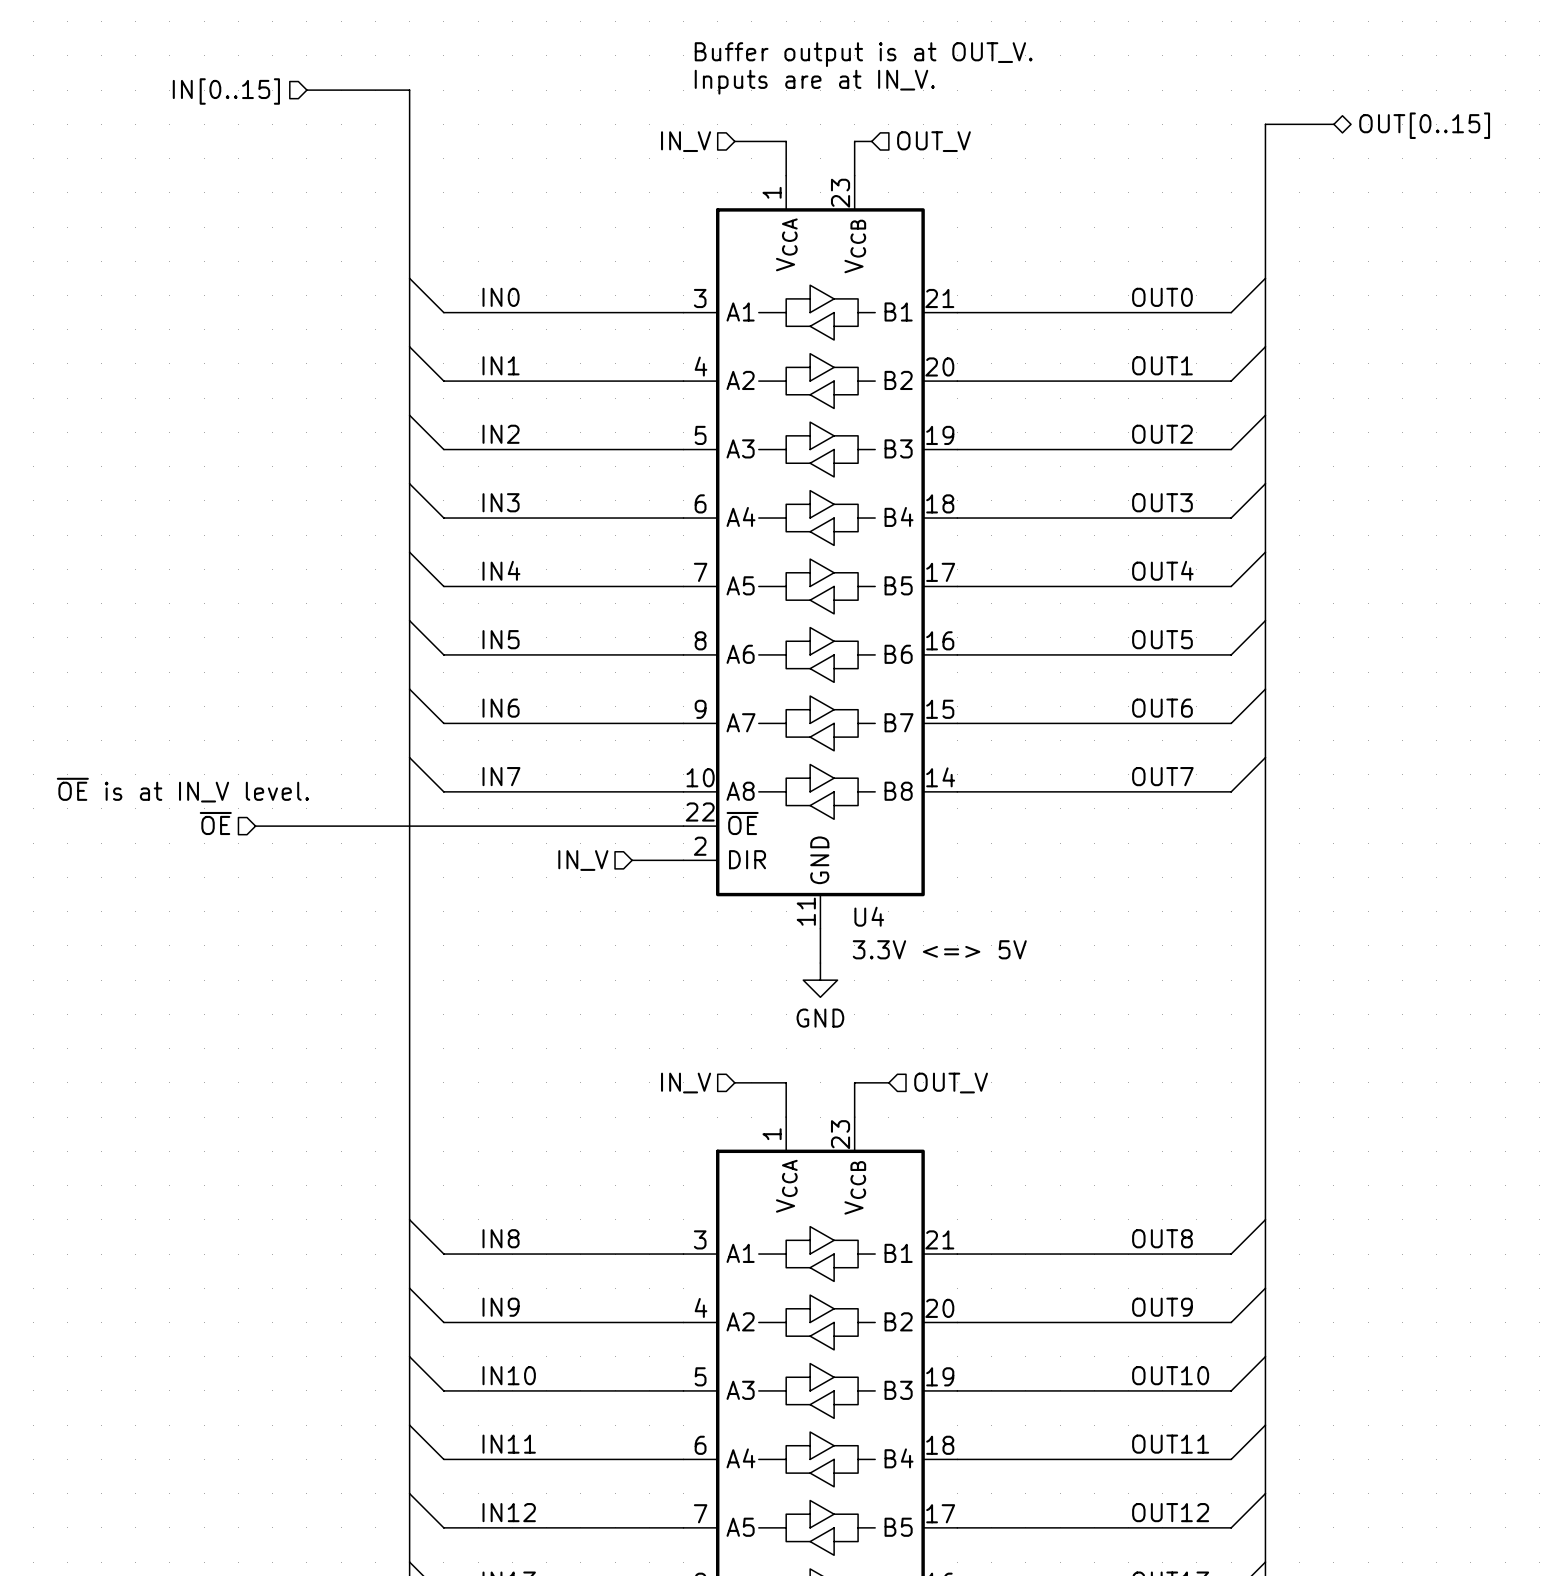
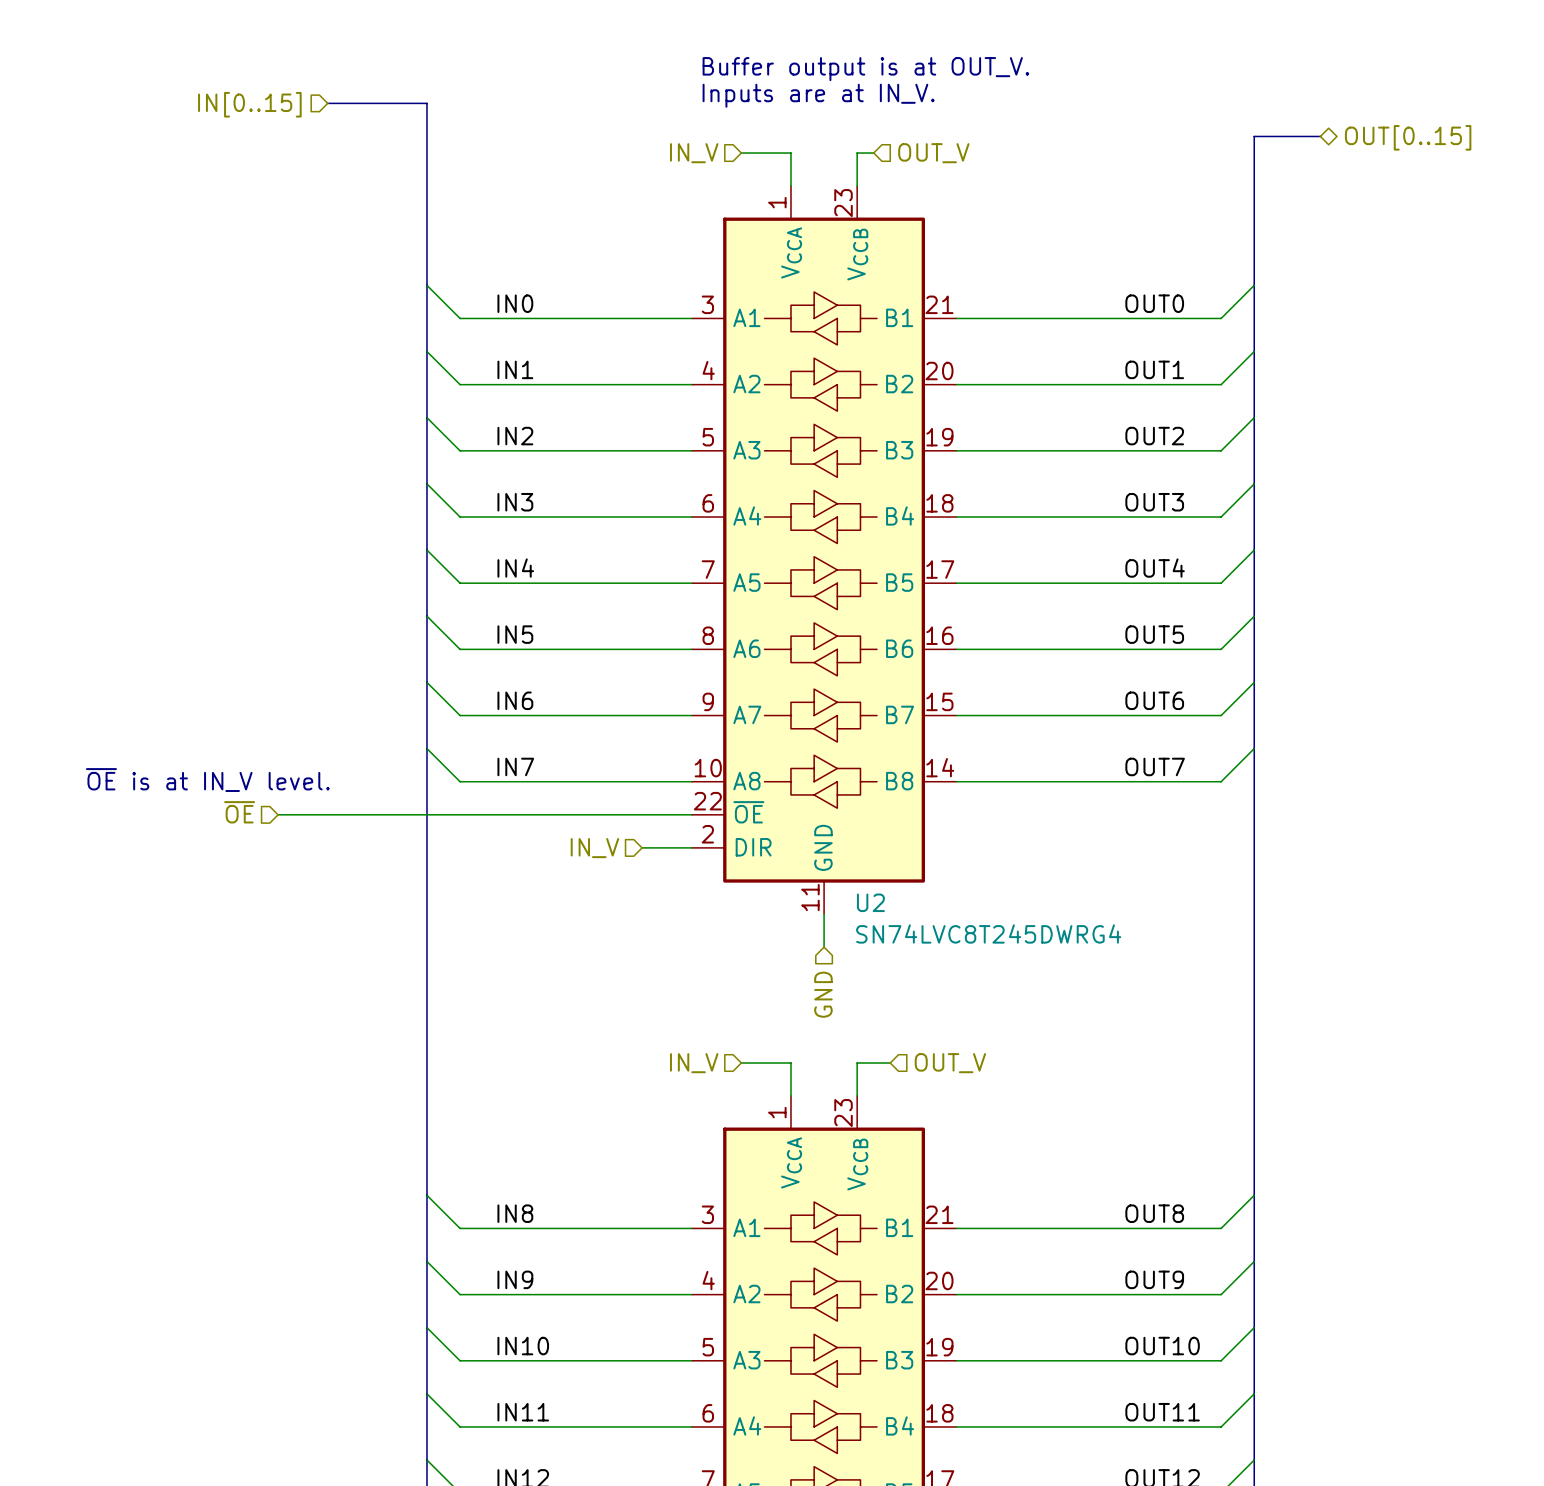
U4 name: U4 (869, 916) -> U2 (870, 902)
U4 value: 3.3V <=> 5V (939, 949) -> SN74LVC8T245DWRG4 (988, 933)
power symbol: GND (820, 980) -> none
hierarchical label: none -> GND (823, 994)

